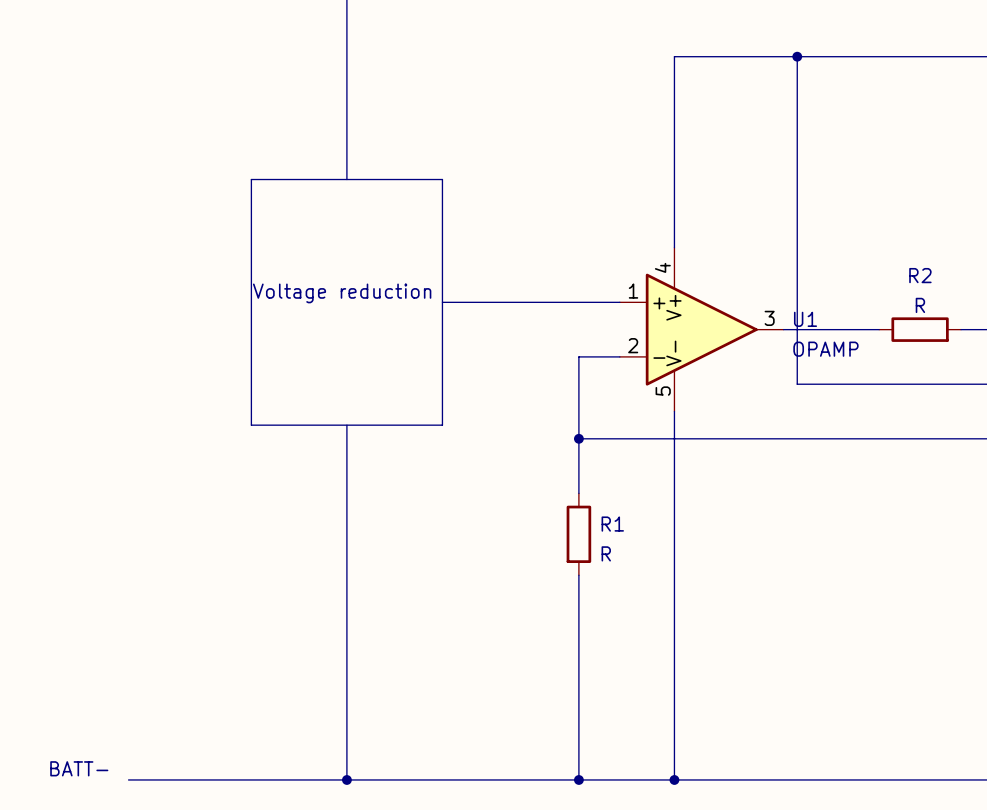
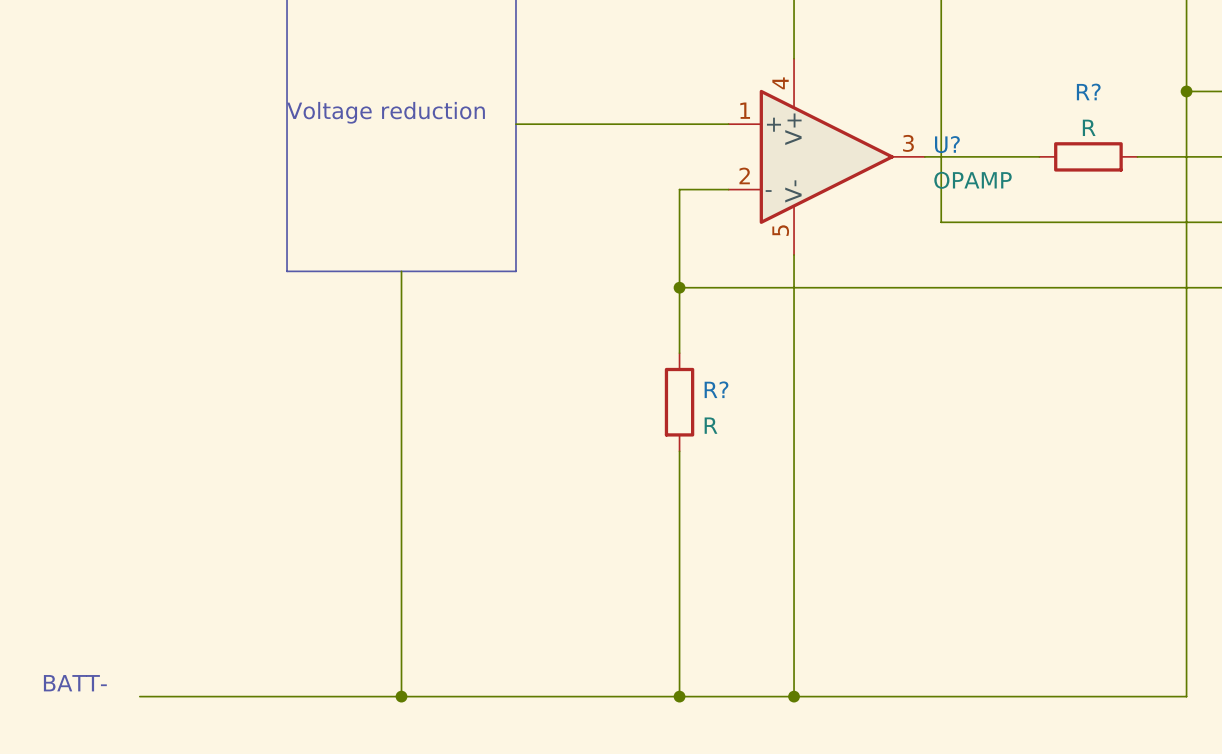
R2 name: R2 (920, 275) -> R? (1088, 91)
U1 name: U1 (805, 319) -> U? (947, 144)
R1 name: R1 (612, 524) -> R? (716, 389)

